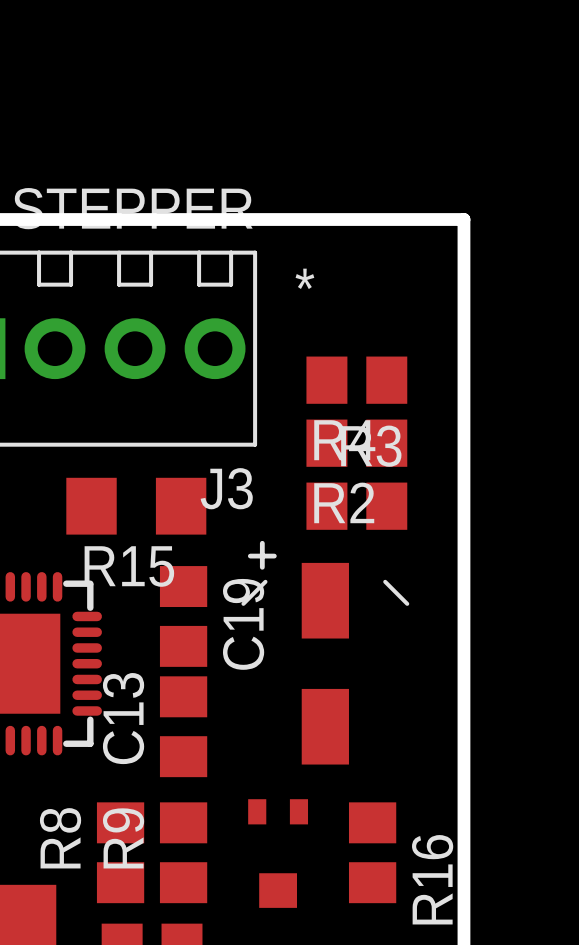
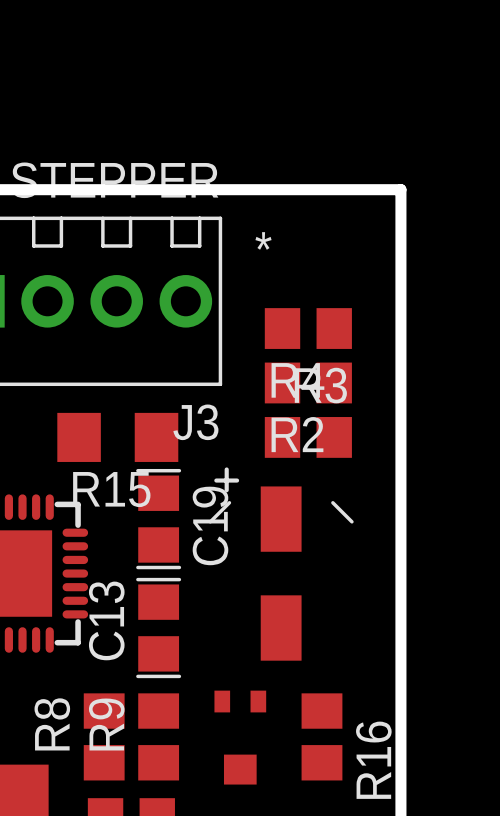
C19 footprint: [159, 566, 208, 667] -> [136, 468, 182, 570]
C13 footprint: [159, 676, 208, 778] -> [136, 577, 182, 679]

